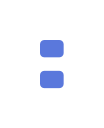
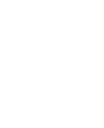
part: (51, 64) -> none

